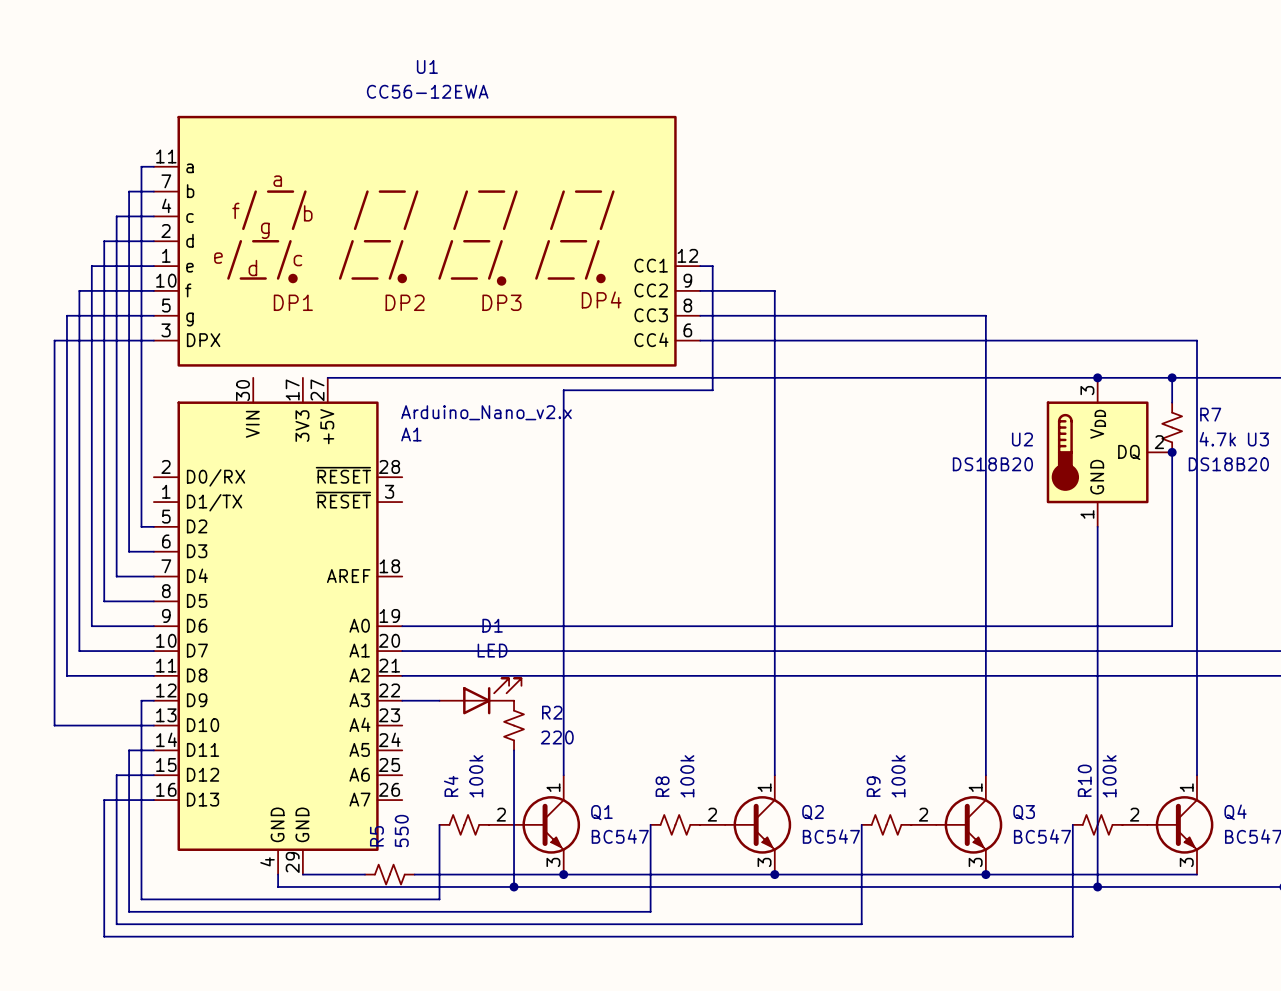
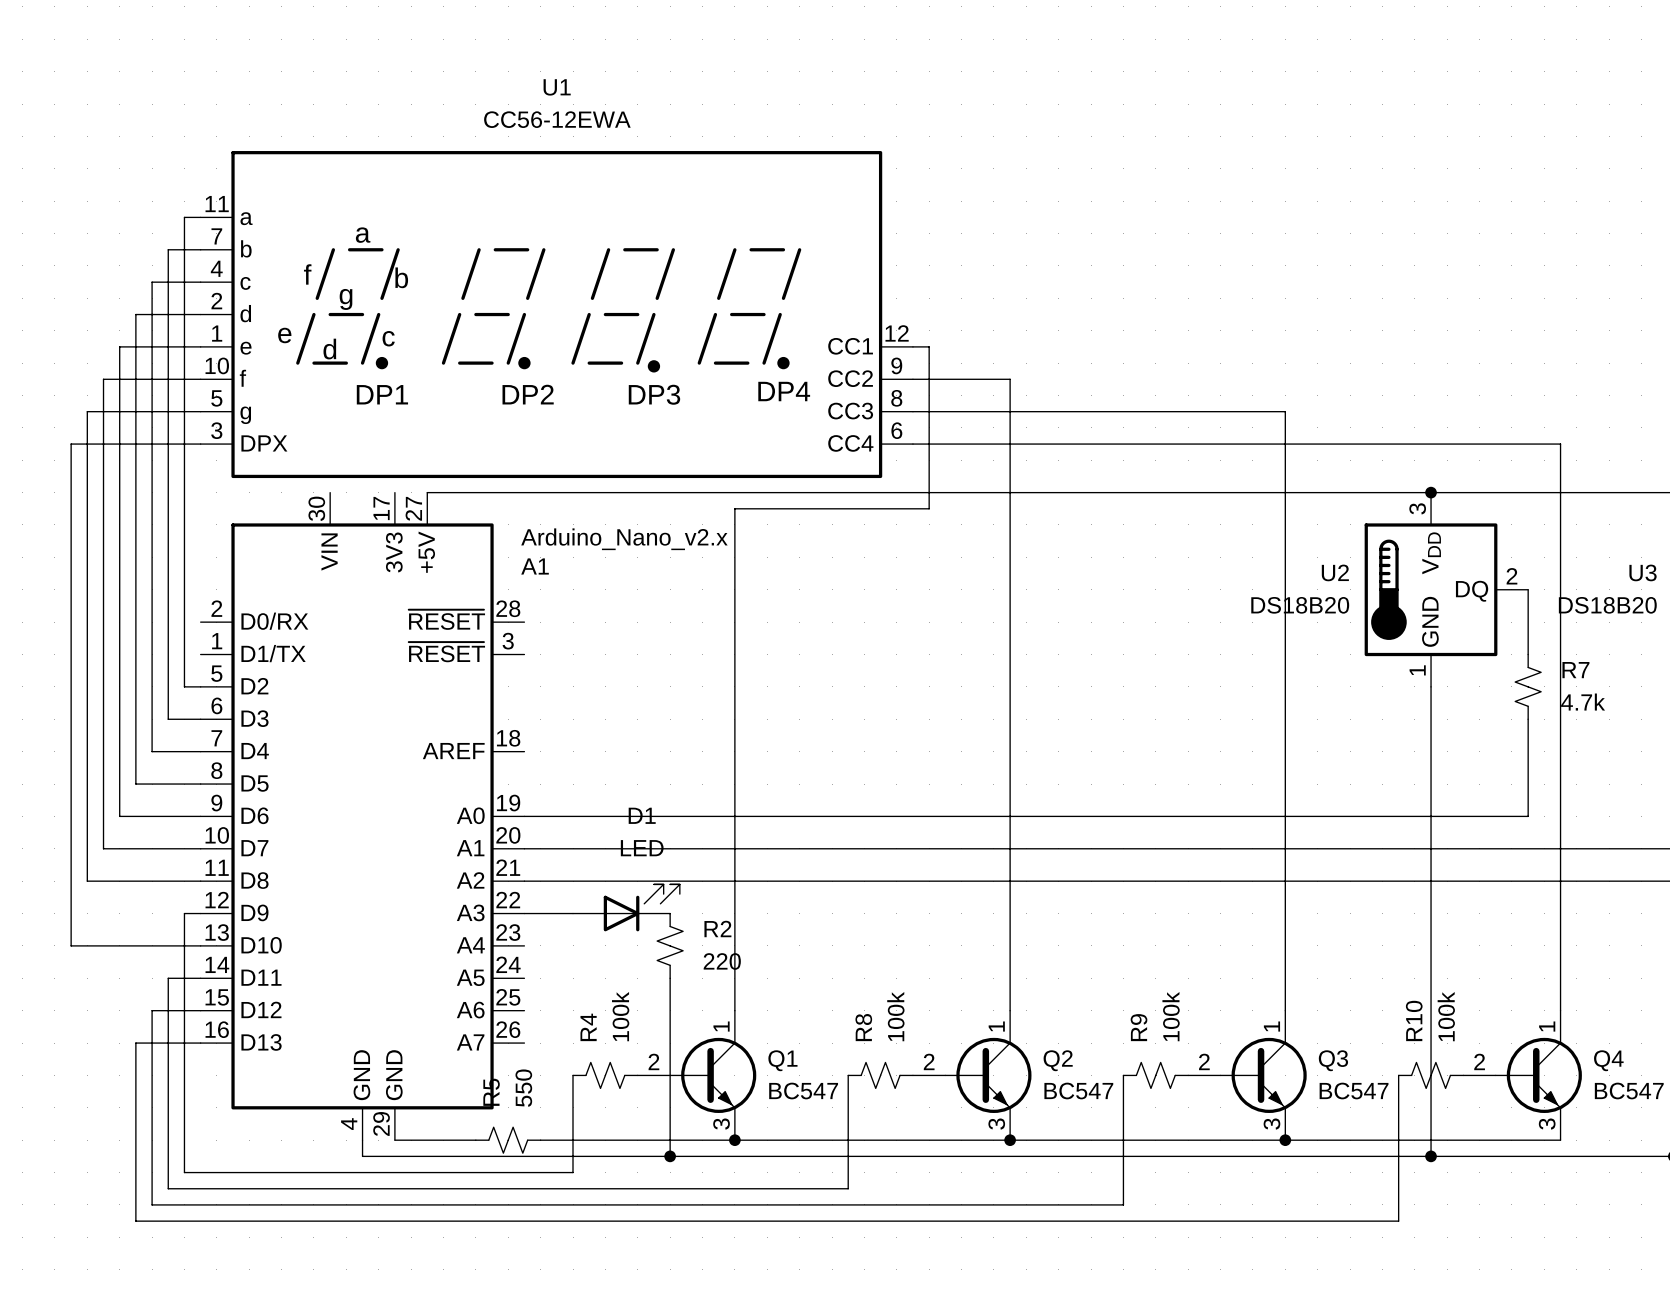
wire: (1172, 377) (1172, 402) -> none
junction: (1172, 377) -> none
R7 position: (1172, 427) -> (1528, 686)
junction: (1172, 452) -> none

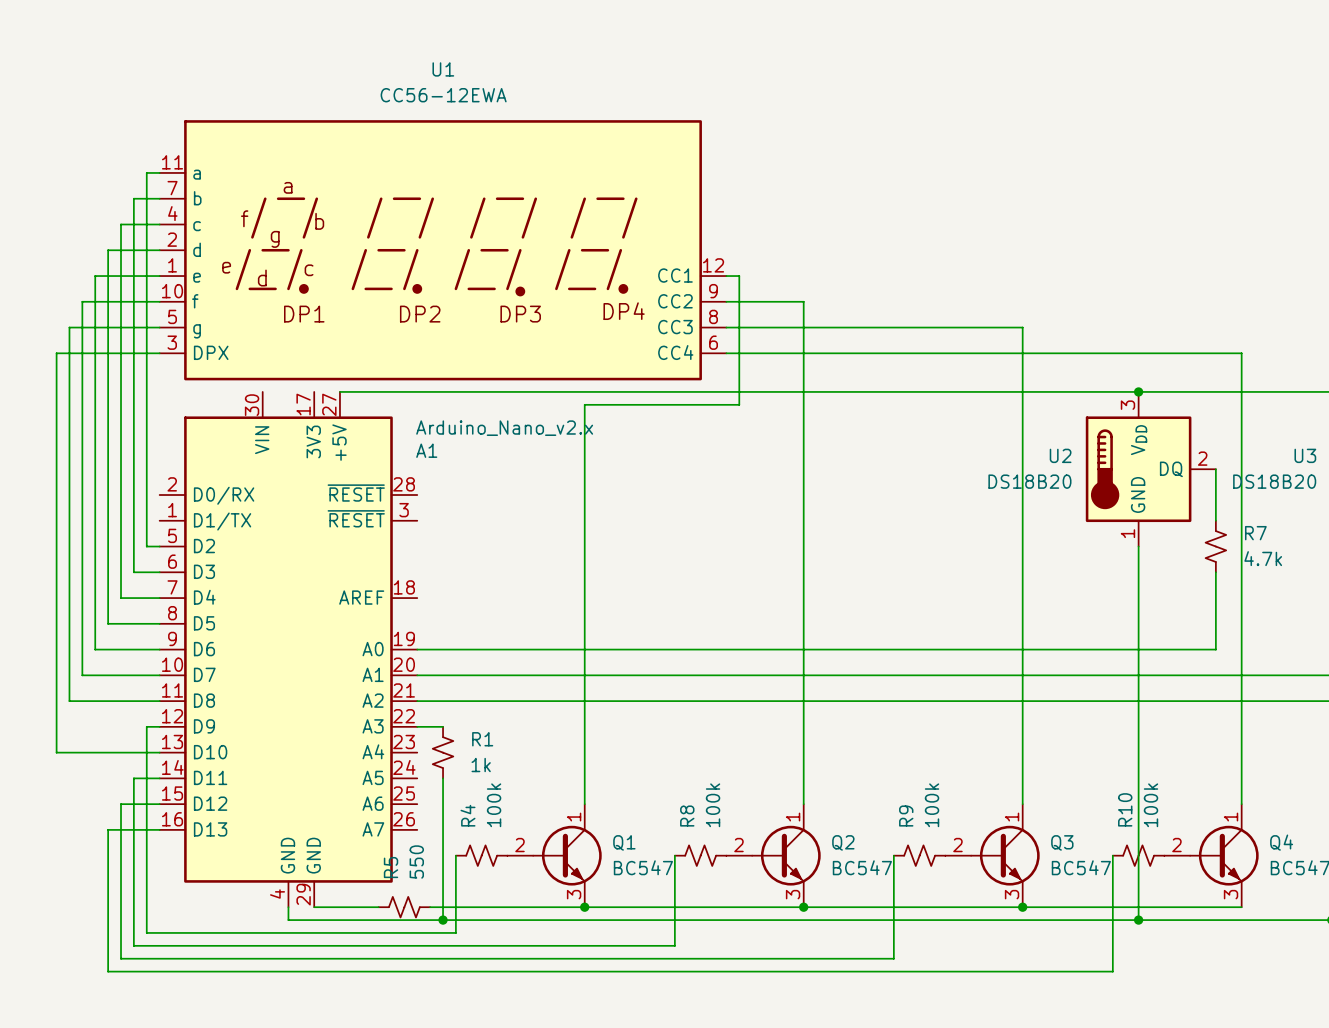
D1: LED (626, 907) -> none
wire: (556, 913) (573, 913) -> none
R1: none -> 1k (443, 752)
R2: 220 (670, 945) -> none
wire: (670, 978) (670, 1156) -> (443, 778) (443, 920)
junction: none -> (443, 920)
junction: (670, 1156) -> none

